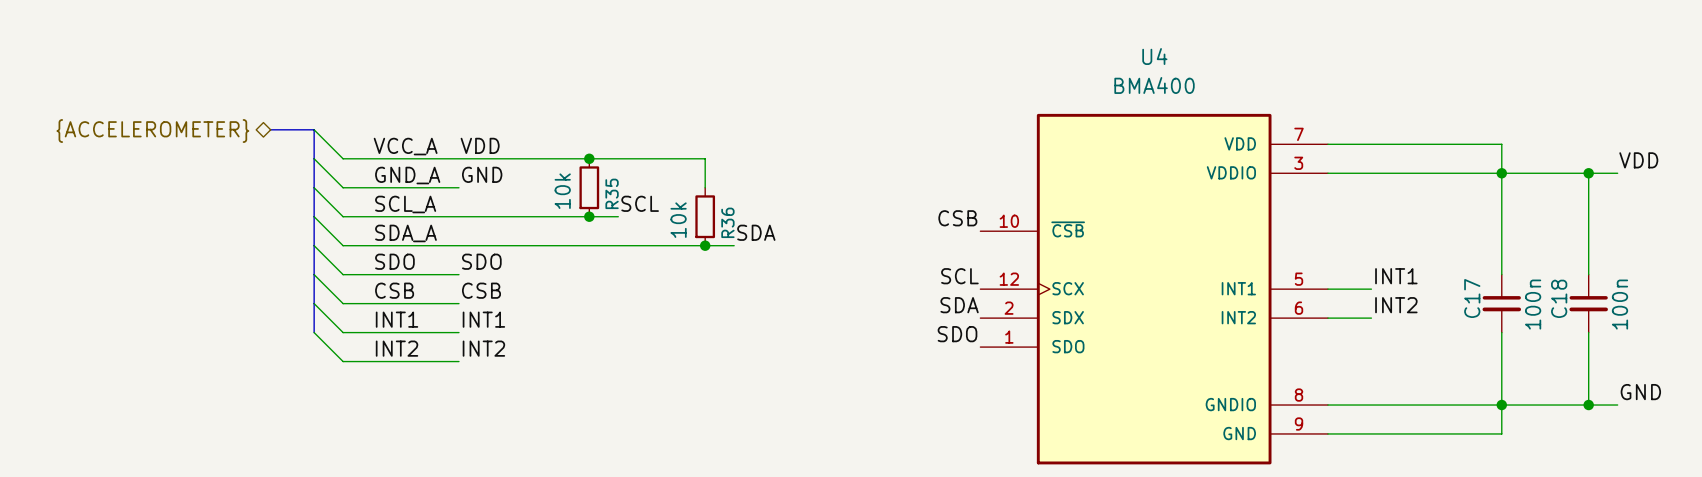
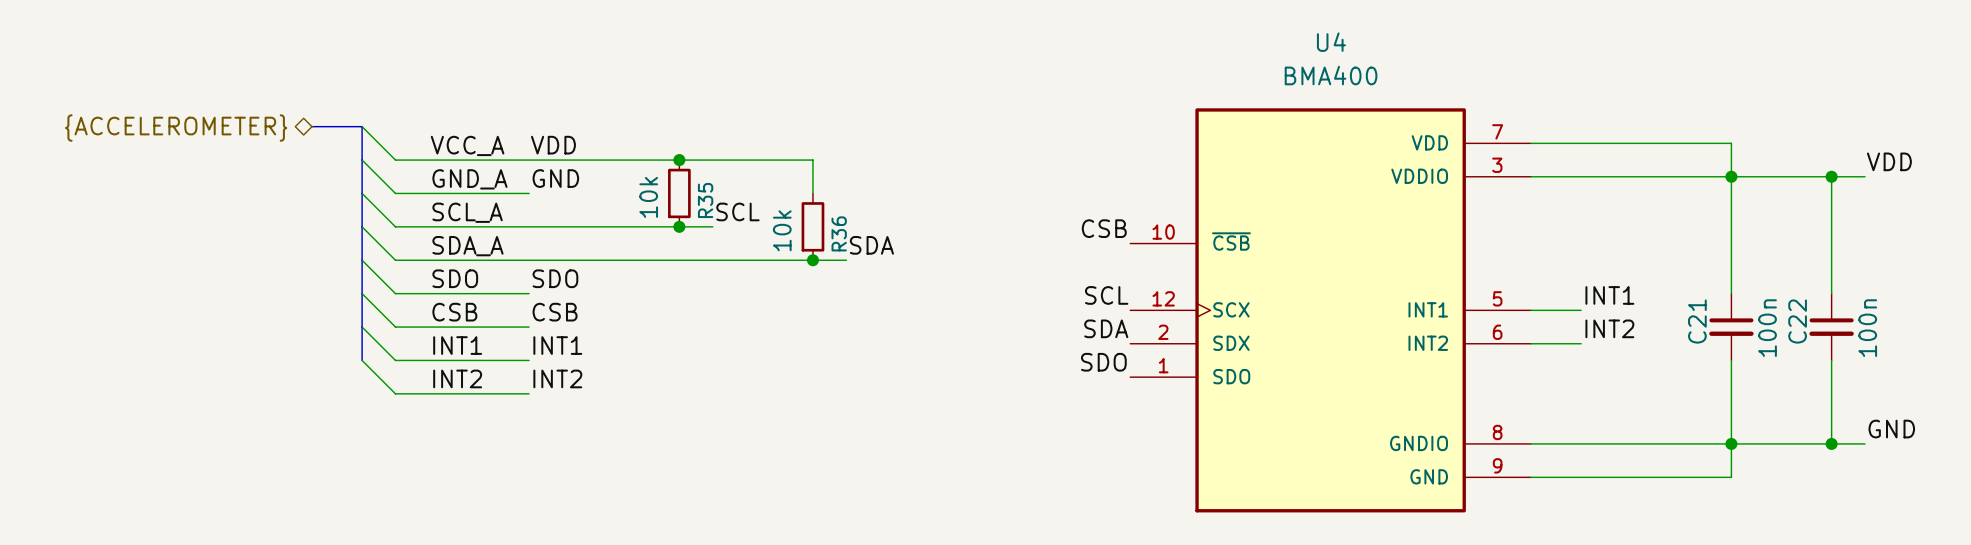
C17 name: C17 (1472, 298) -> C21 (1697, 321)
C18 name: C18 (1559, 298) -> C22 (1797, 321)

